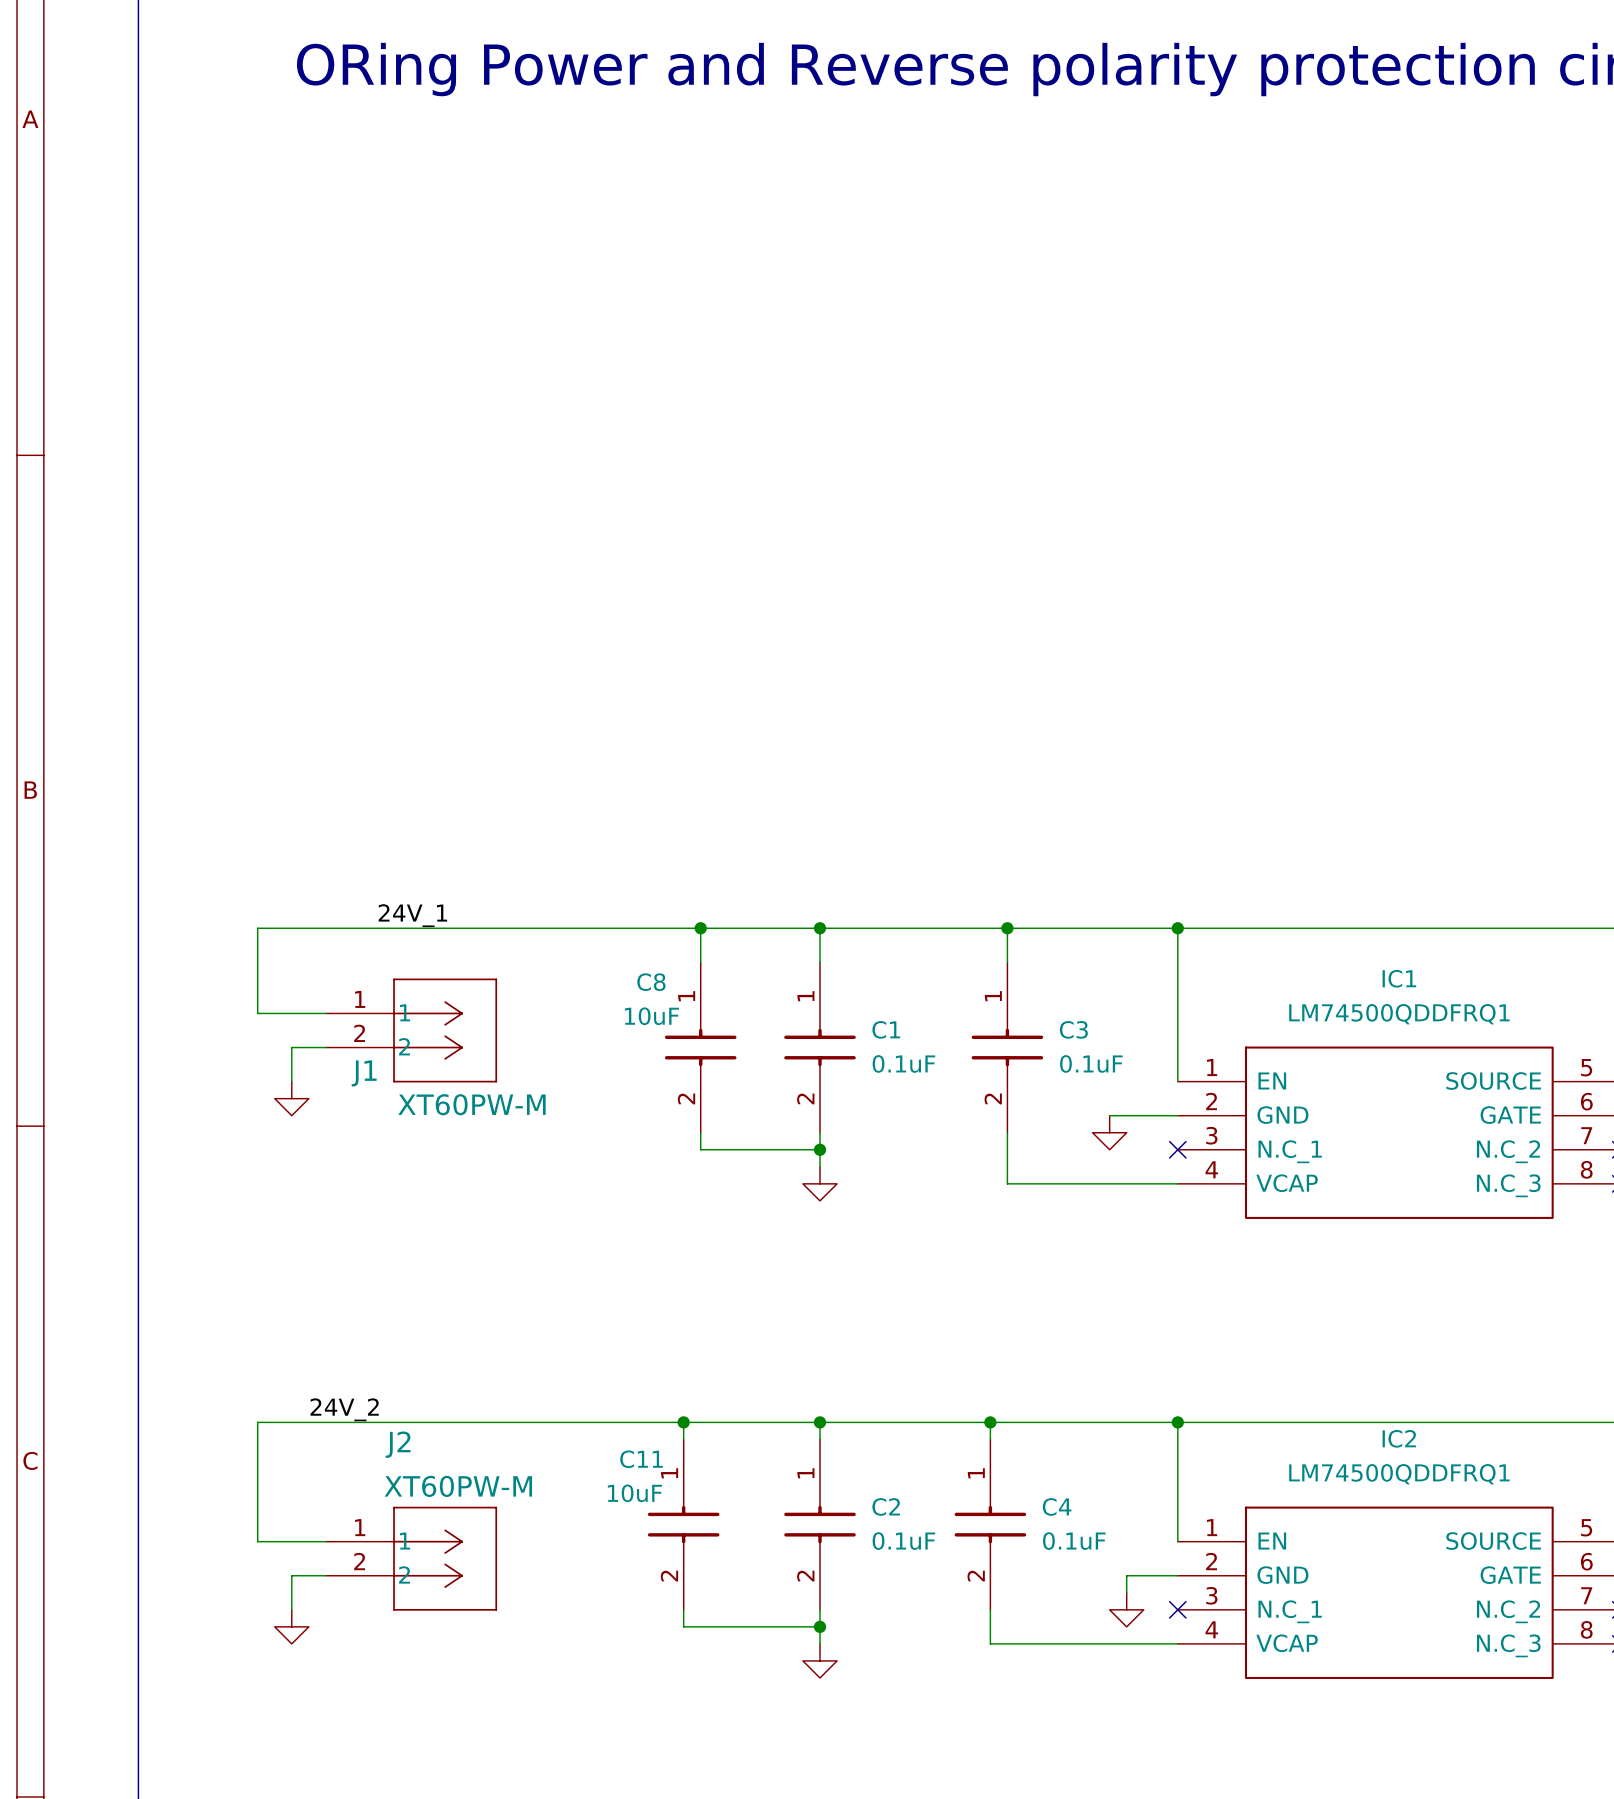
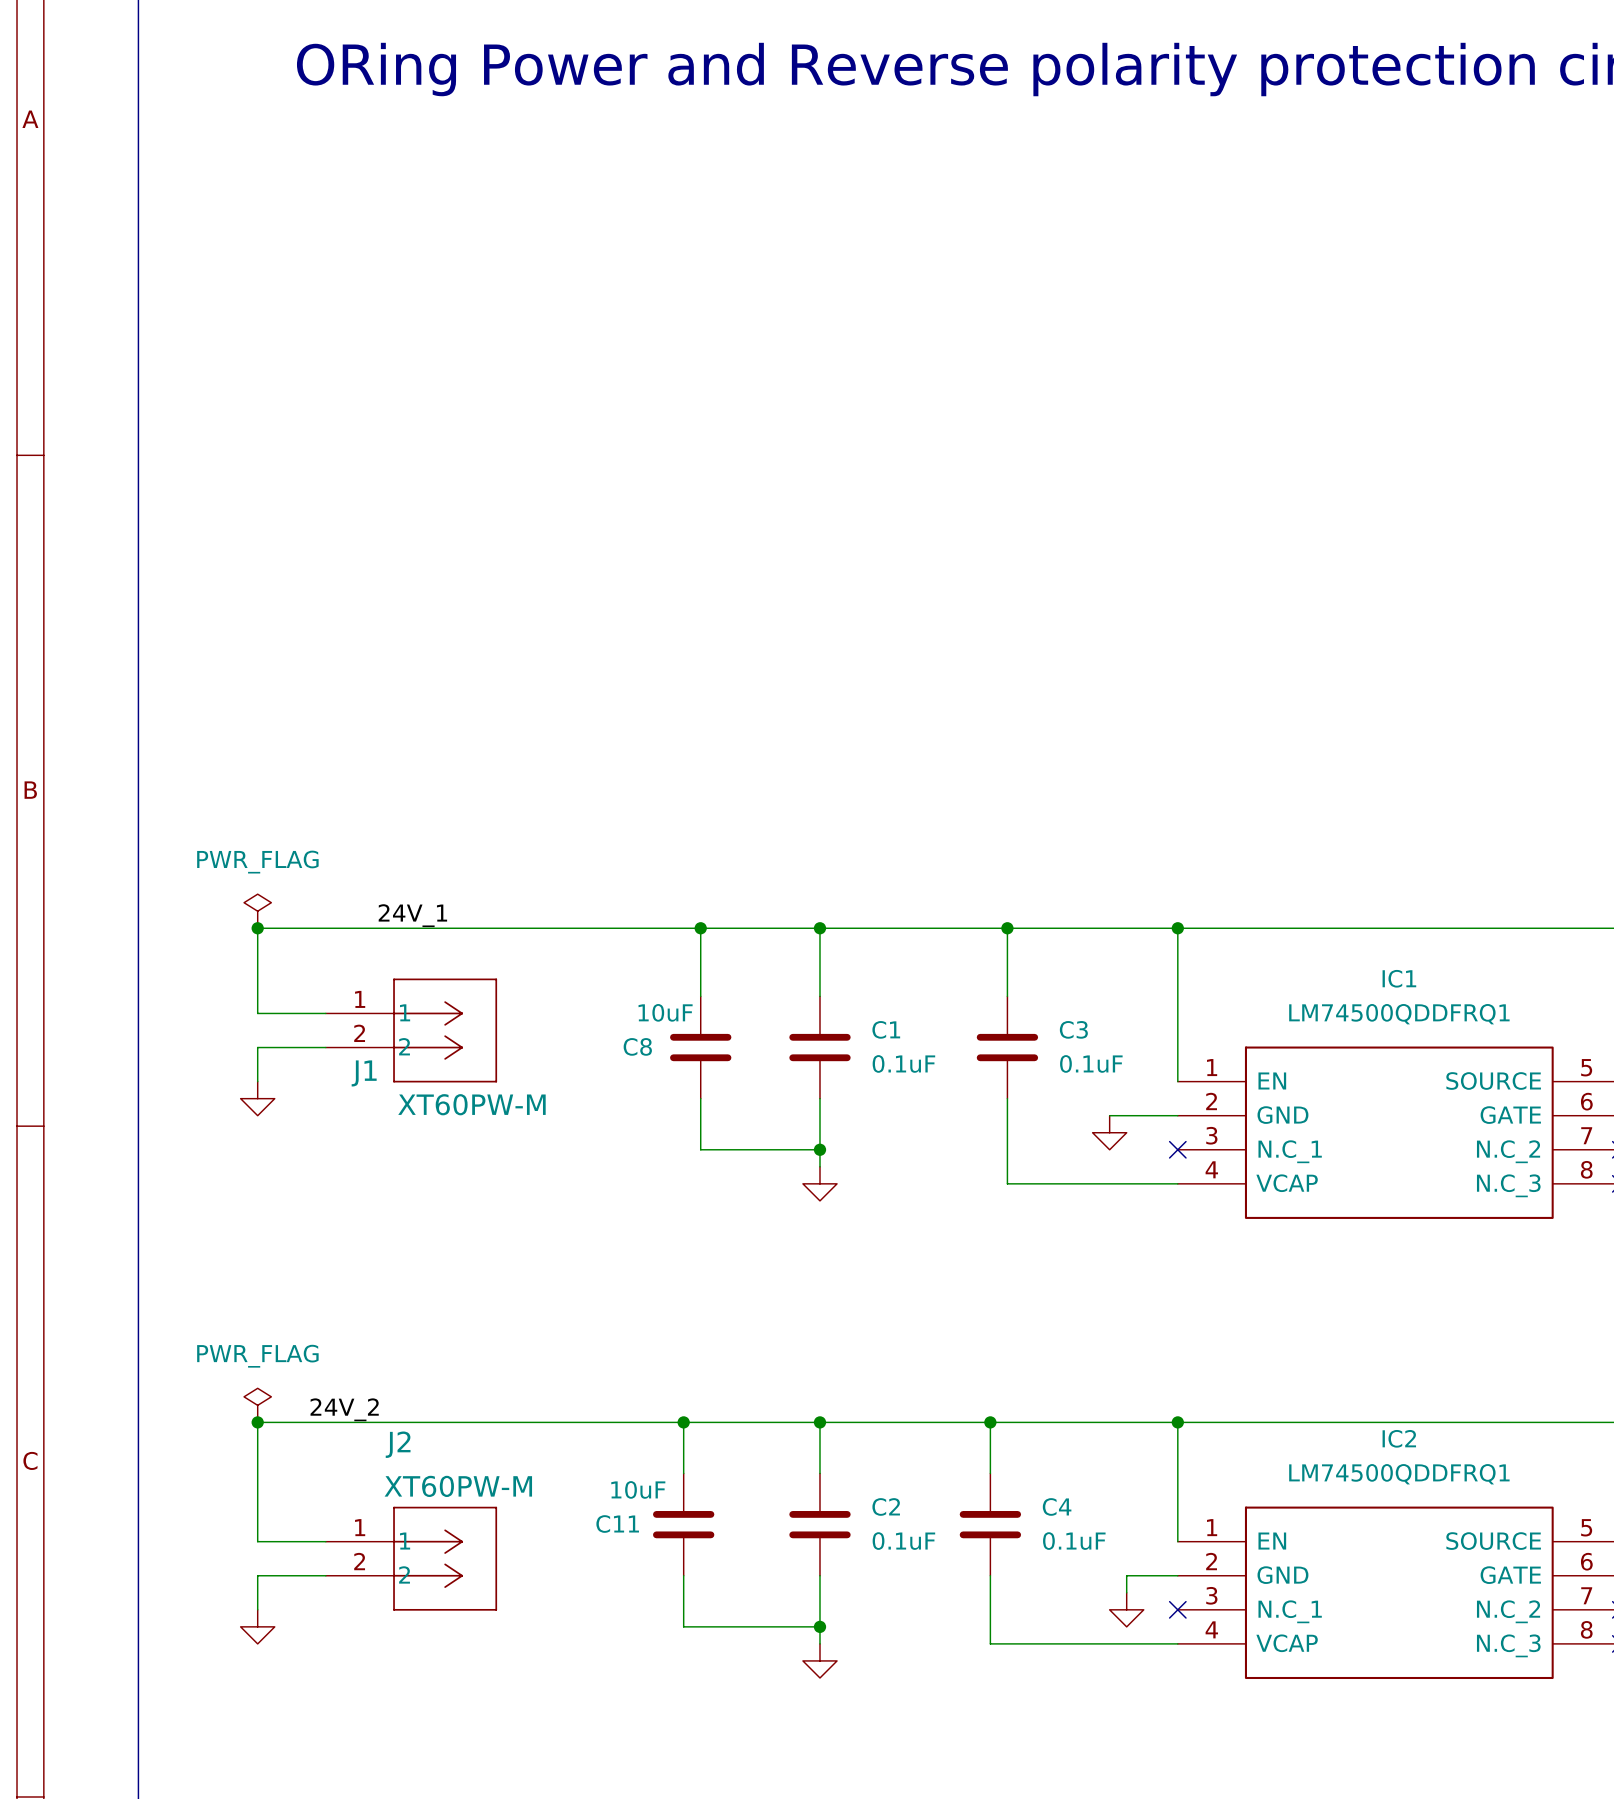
power symbol: none -> PWR_FLAG (257, 911)
junction: none -> (257, 928)
C8 symbol: [664, 962, 737, 1133] -> [670, 996, 732, 1099]
C1 symbol: [784, 962, 856, 1133] -> [789, 996, 851, 1099]
C3 symbol: [971, 962, 1044, 1133] -> [976, 996, 1039, 1099]
C8 name position: C8 (651, 982) -> C8 (637, 1046)
wire: (291, 1047) (291, 1081) -> (291, 1047) (257, 1047) (257, 1081)
power symbol position: (291, 1098) -> (257, 1098)
power symbol: none -> PWR_FLAG (257, 1405)
junction: none -> (257, 1422)
C11 symbol: [647, 1439, 720, 1610] -> [653, 1473, 715, 1576]
C2 symbol: [784, 1439, 856, 1610] -> [789, 1473, 851, 1576]
C4 symbol: [954, 1439, 1027, 1610] -> [959, 1473, 1022, 1576]
C11 name position: C11 (641, 1459) -> C11 (617, 1524)
wire: (291, 1575) (291, 1609) -> (291, 1575) (257, 1575) (257, 1609)
power symbol position: (291, 1626) -> (257, 1626)

